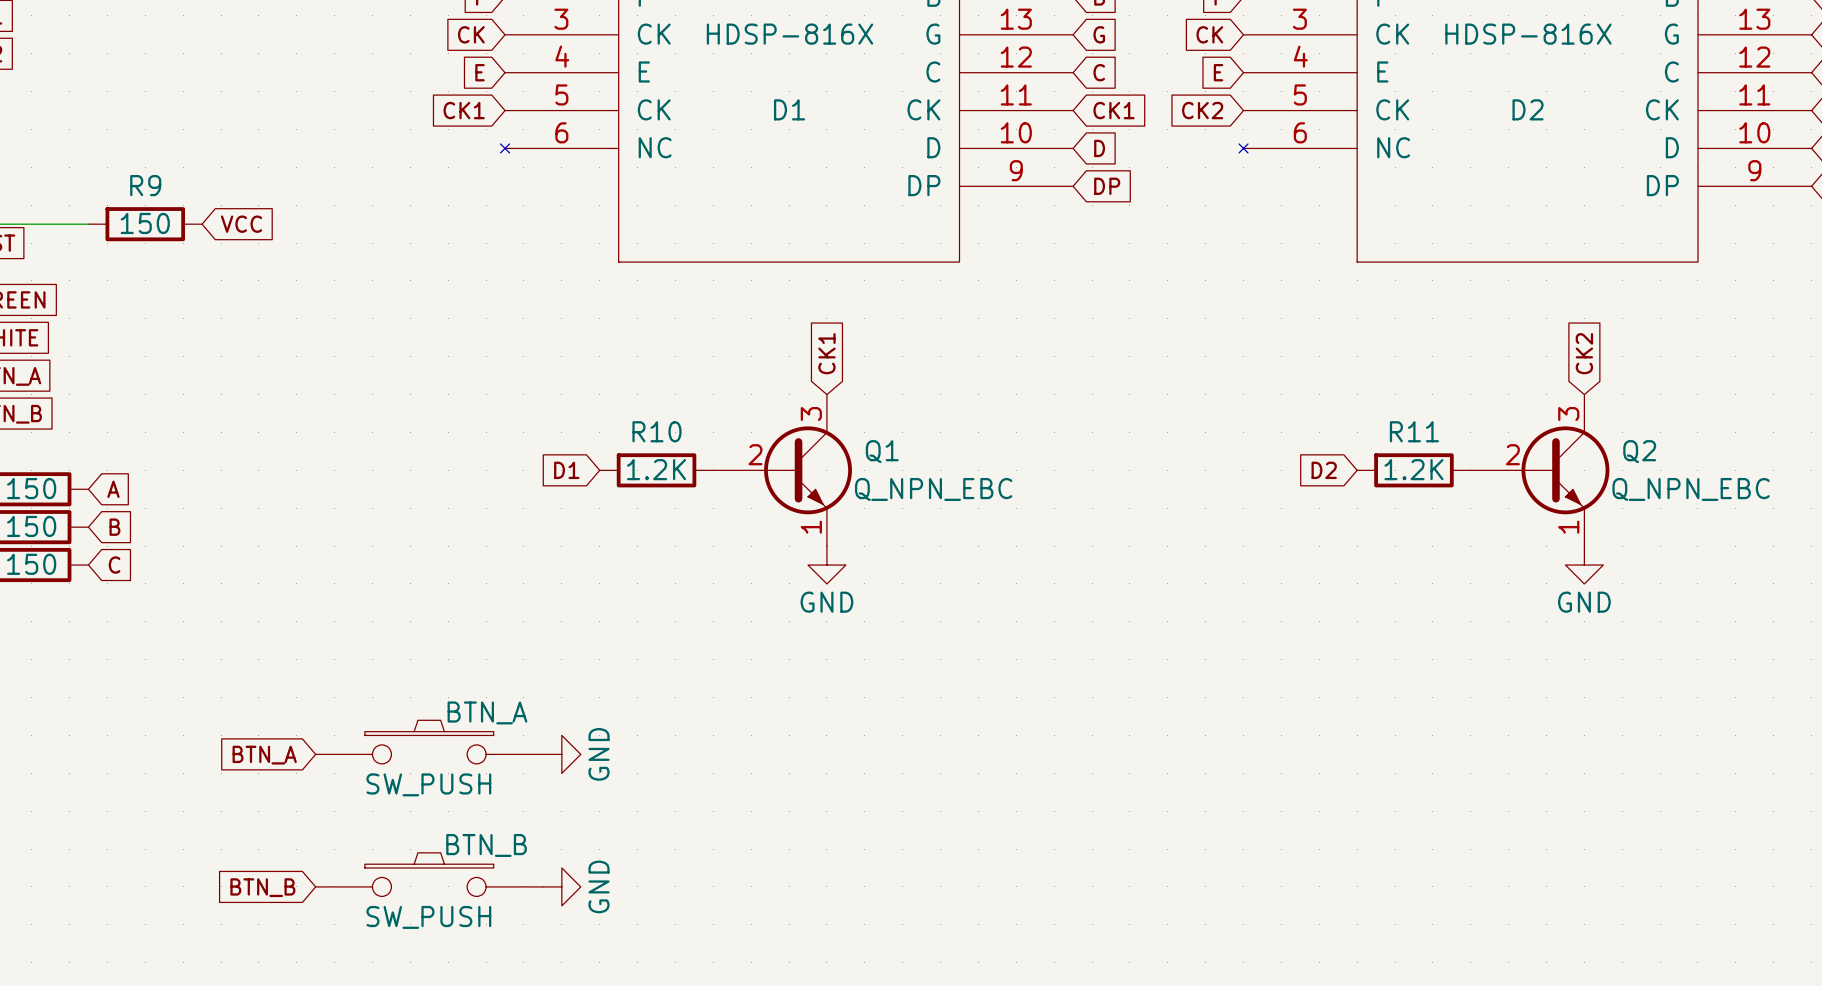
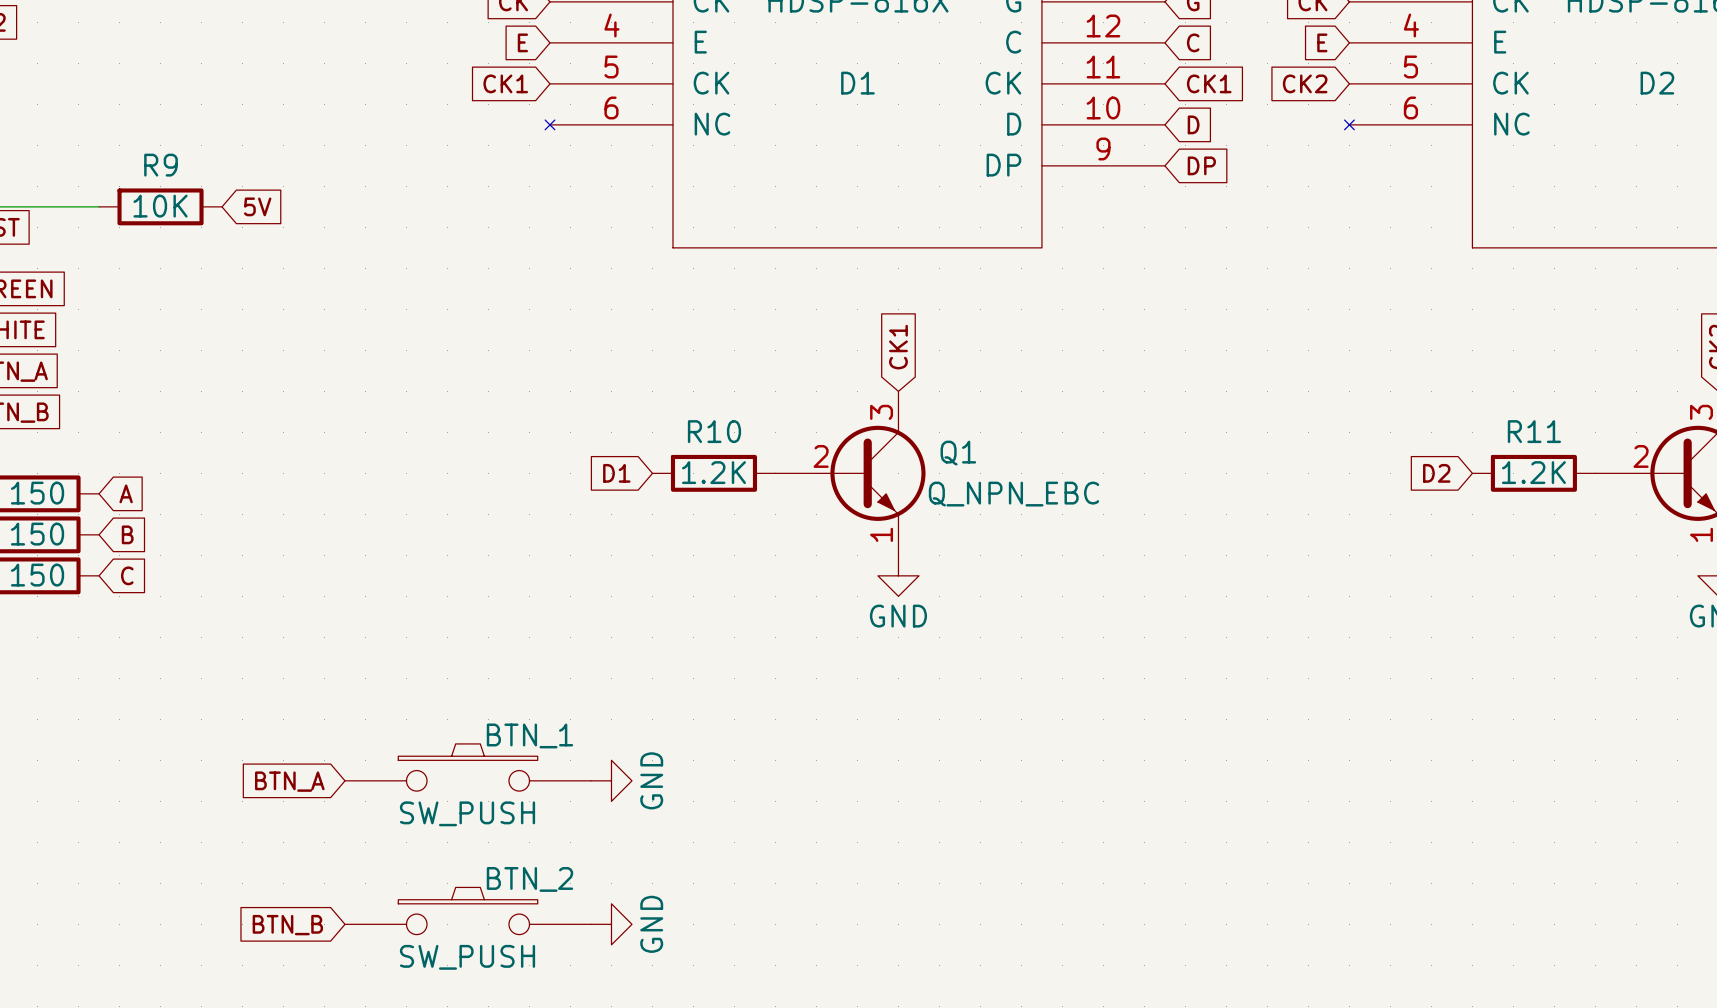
R9 value: 150 (145, 223) -> 10K (160, 206)
global label: VCC (241, 224) -> 5V (257, 206)
BTN_A name: BTN_A (487, 712) -> BTN_1 (529, 735)
BTN_B name: BTN_B (486, 845) -> BTN_2 (529, 879)

